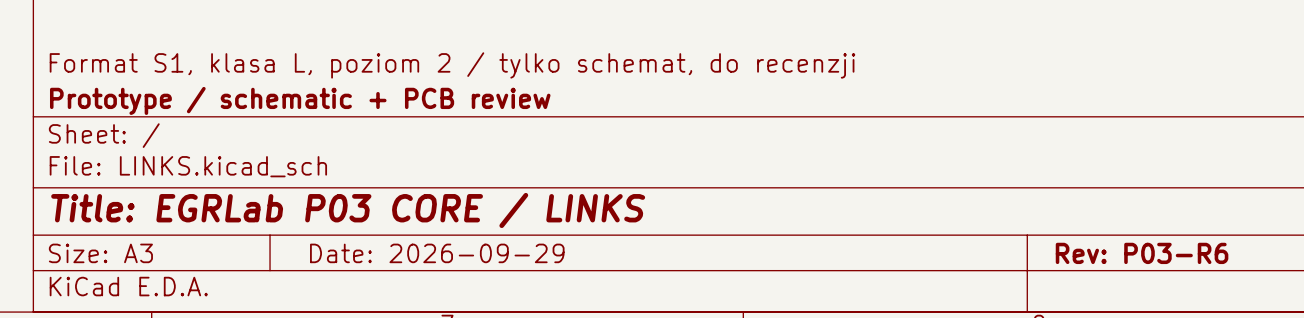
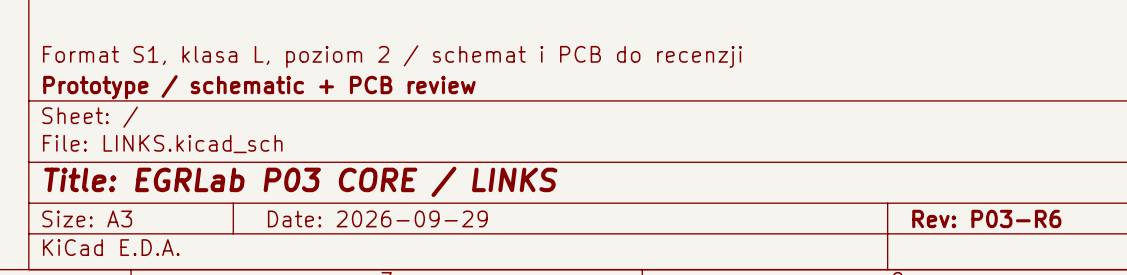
title block: Format S1, klasa L, poziom 2 / tylko schemat, do recenzji (452, 65) -> Format S1, klasa L, poziom 2 / schemat i PCB do recenzji (392, 56)

